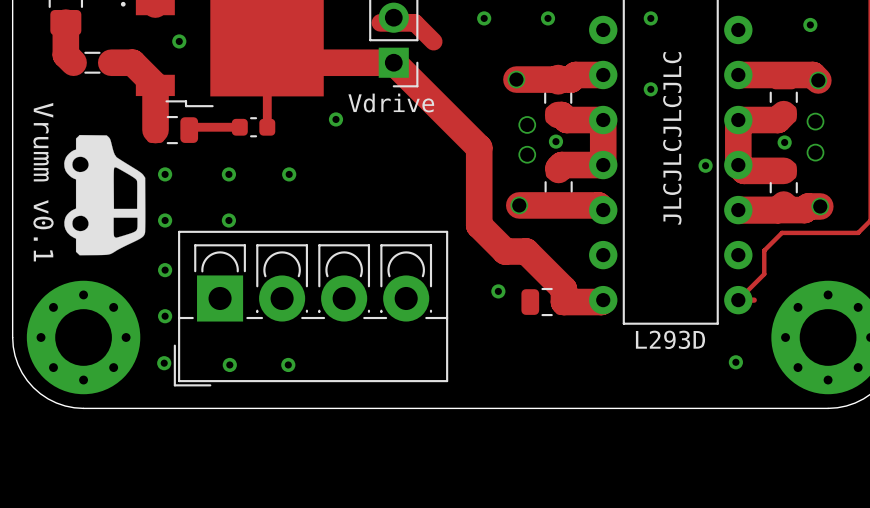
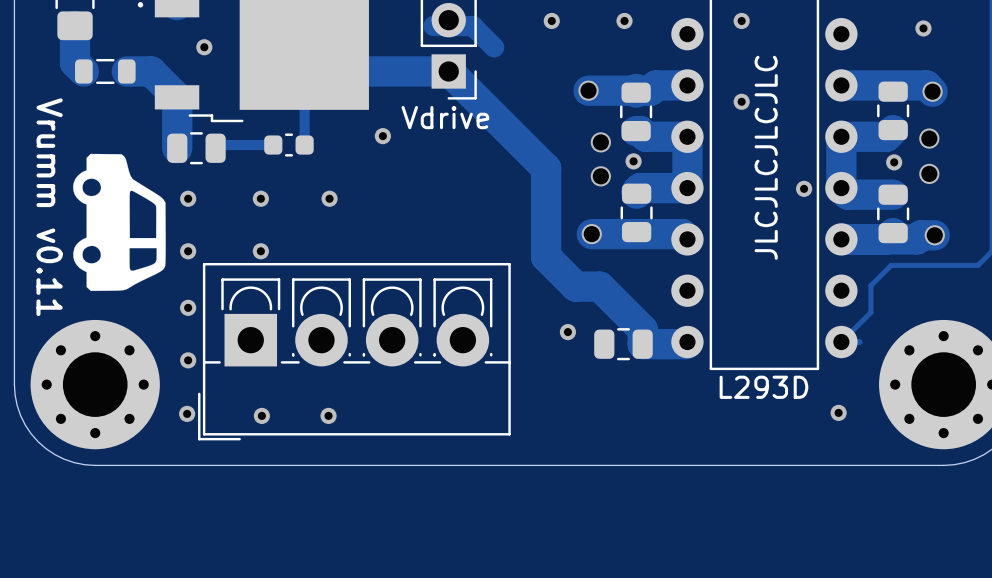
text: Vrumm v0.1 (43, 182) -> Vrumm v0.11 (49, 207)

